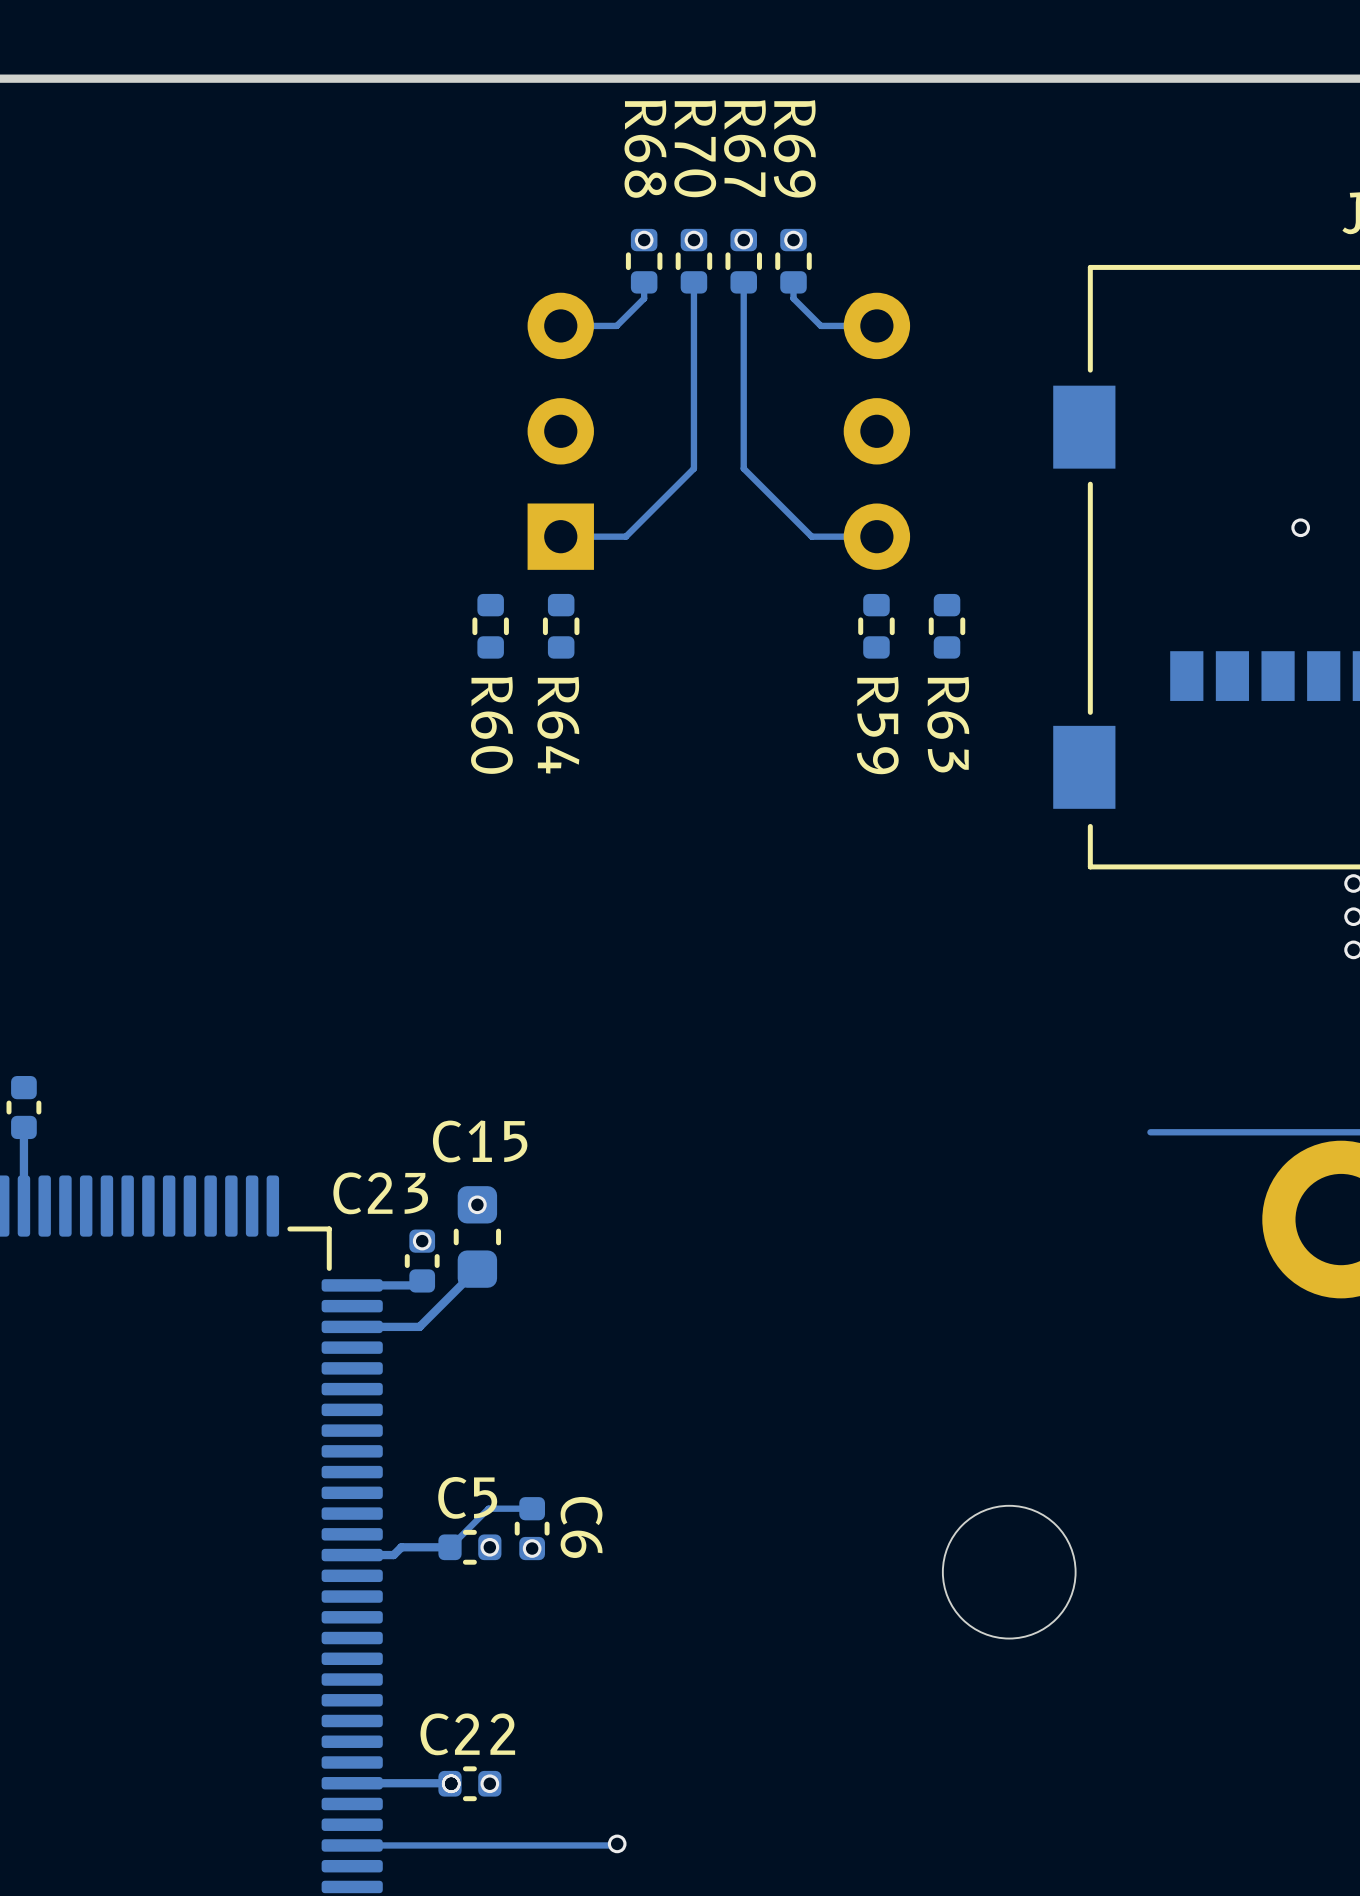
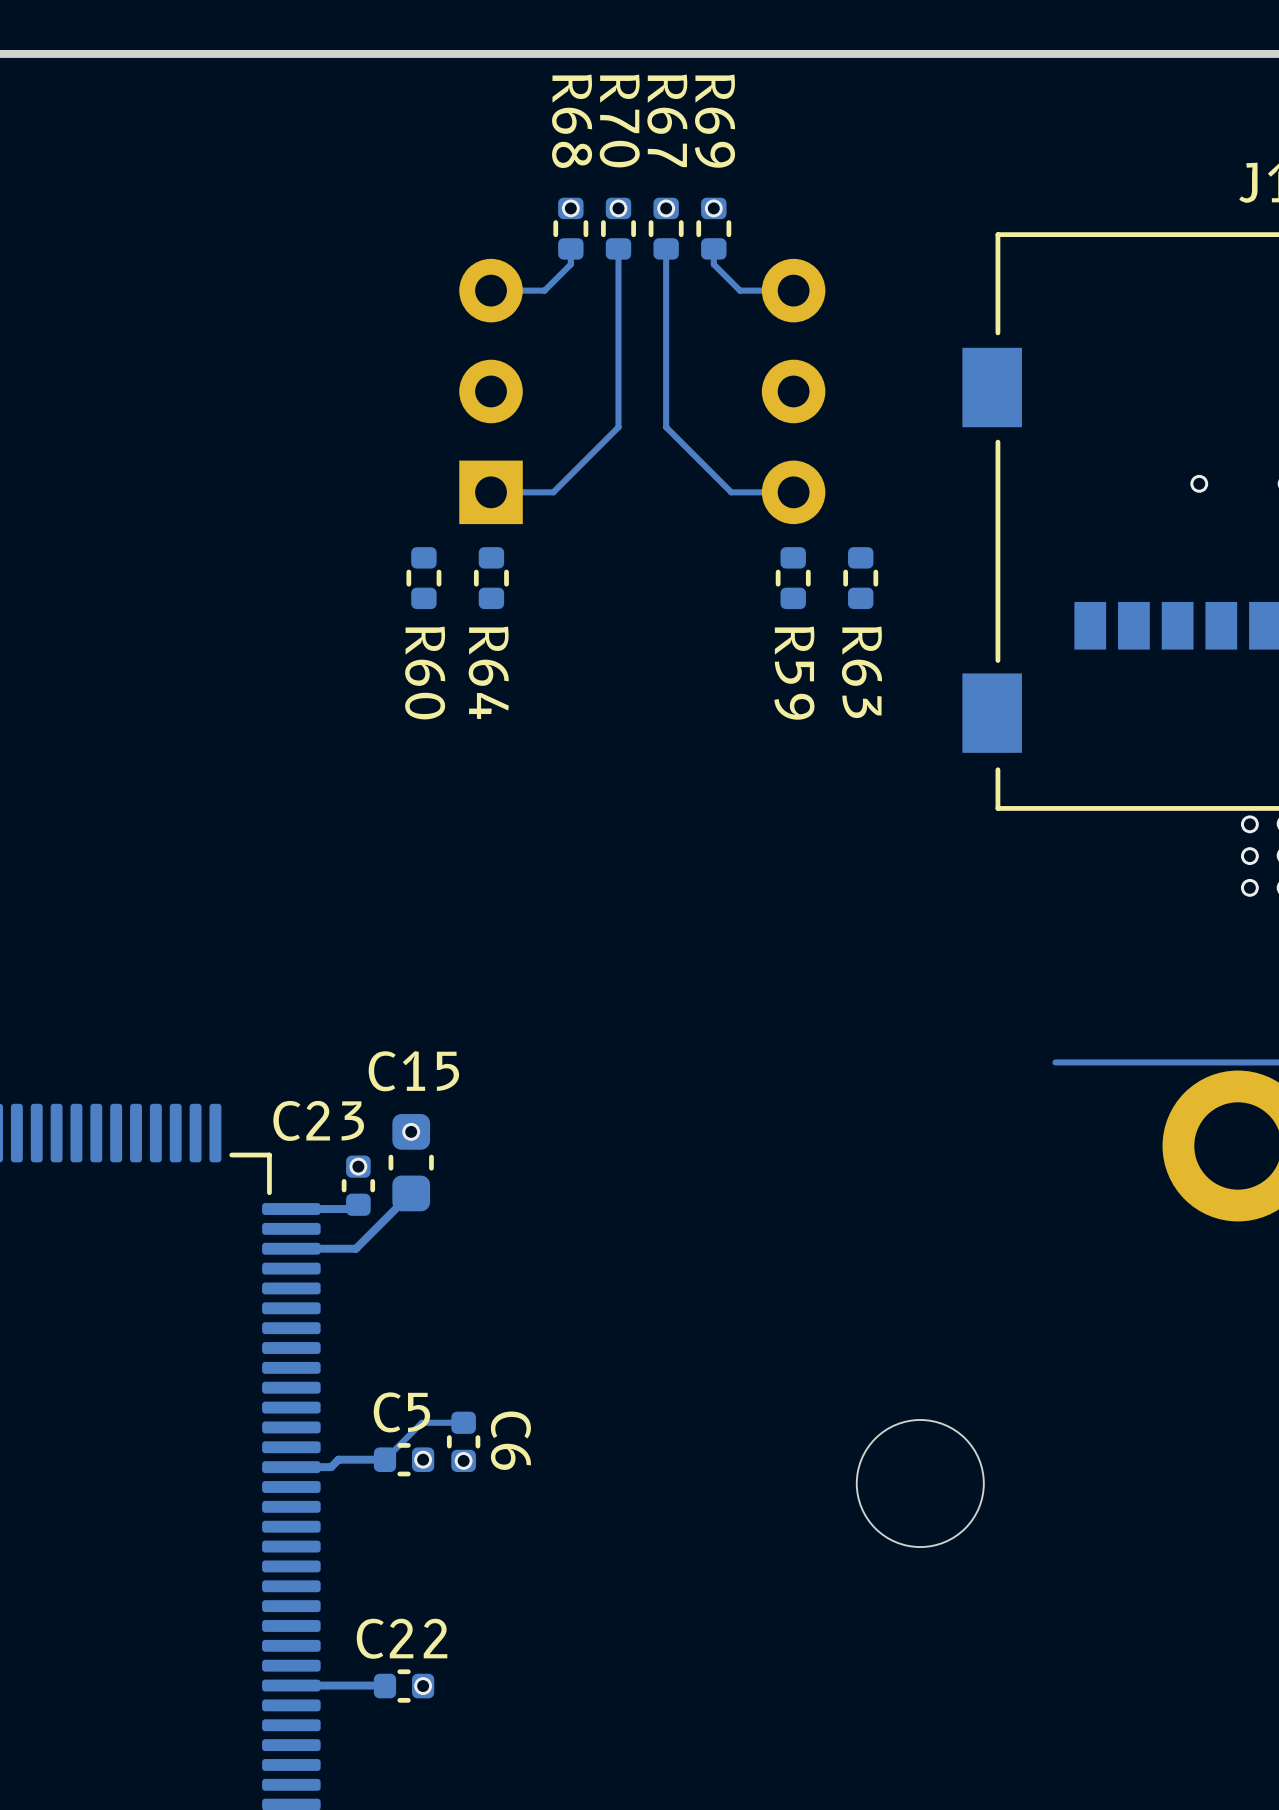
via: (451, 1783) -> none
via: (617, 1843) -> none
track: (352, 1845) (614, 1845) (613, 1843) (617, 1843) (617, 1848) (615, 1845) -> none

